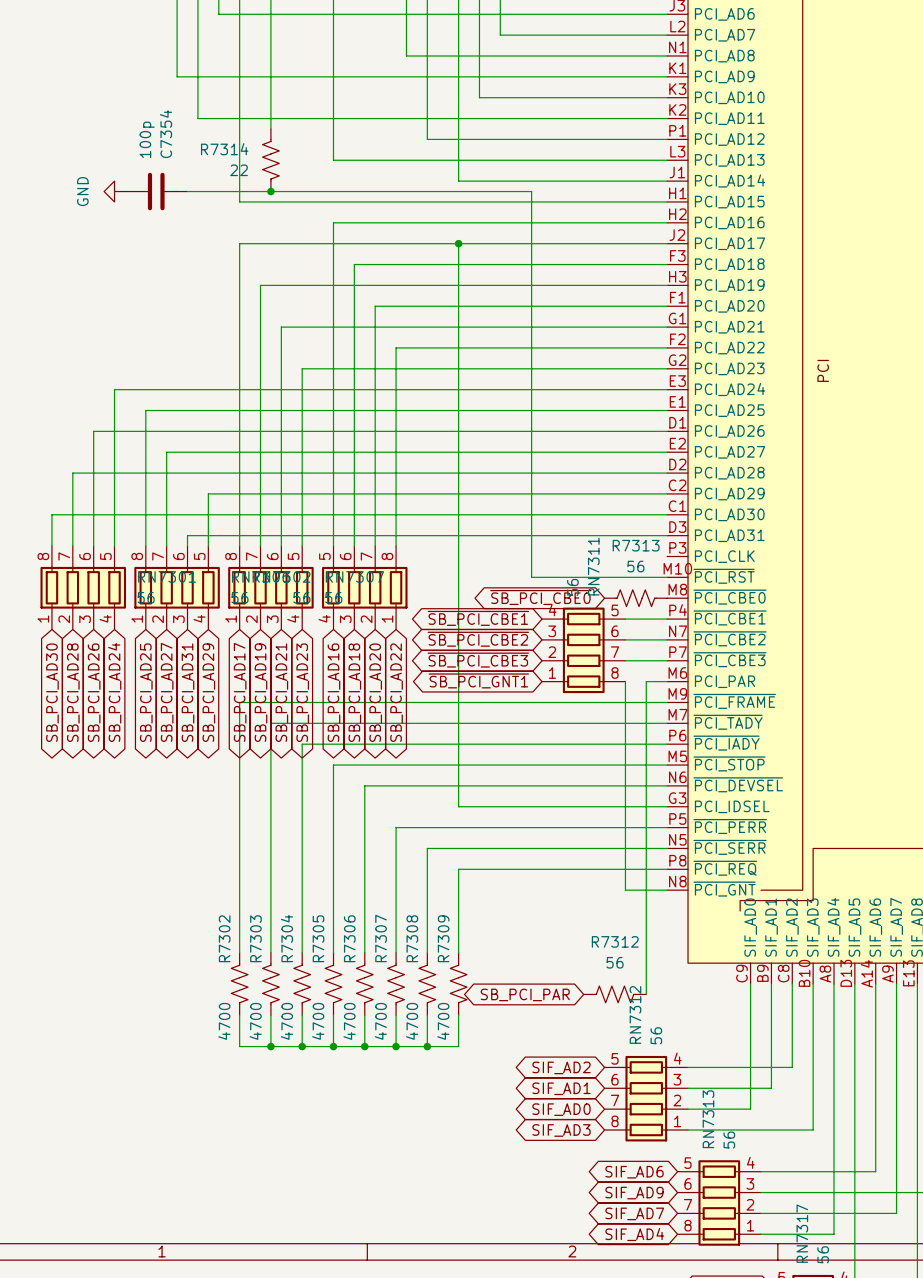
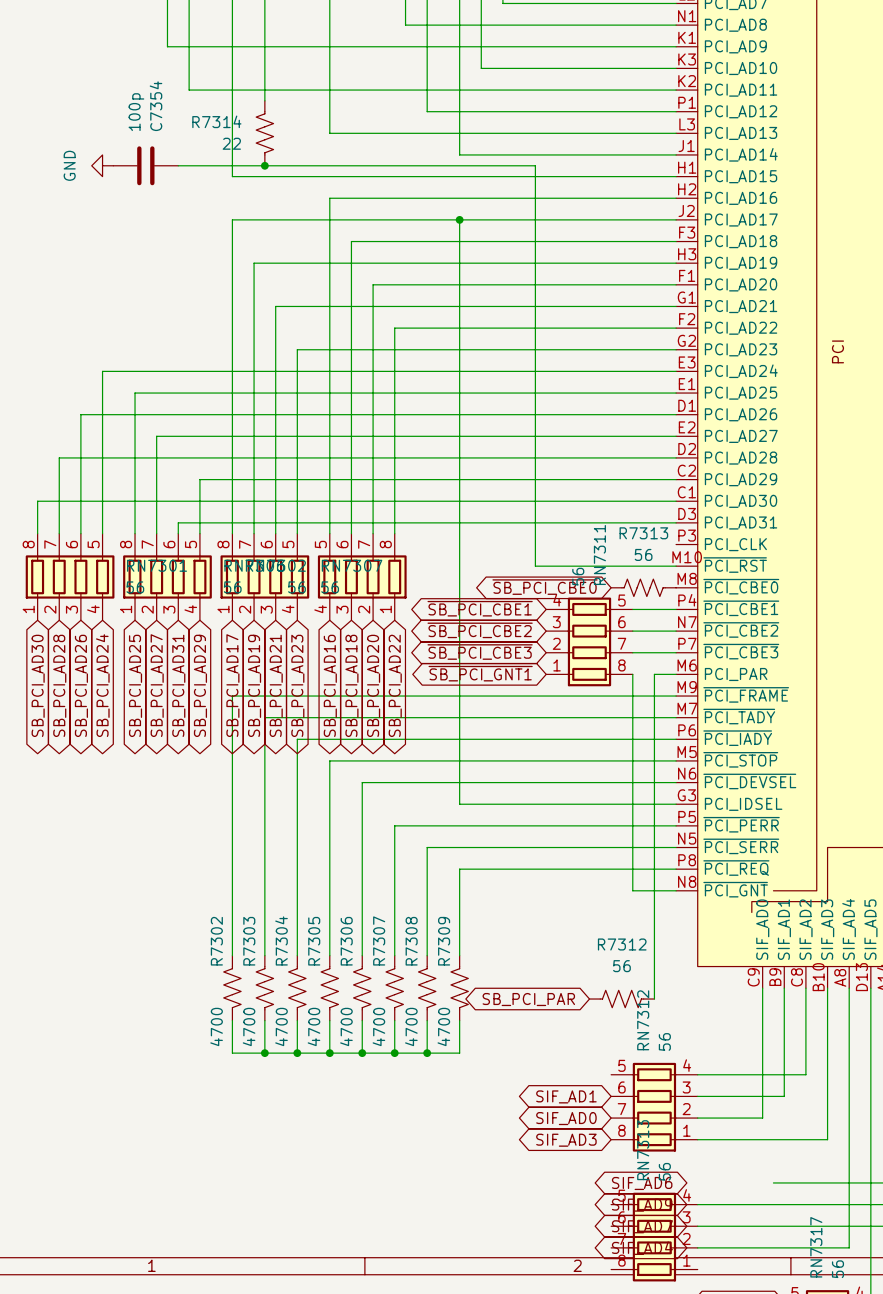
global label: SIF_AD2 (561, 1067) -> none
RN7313 position: (719, 1202) -> (654, 1237)

